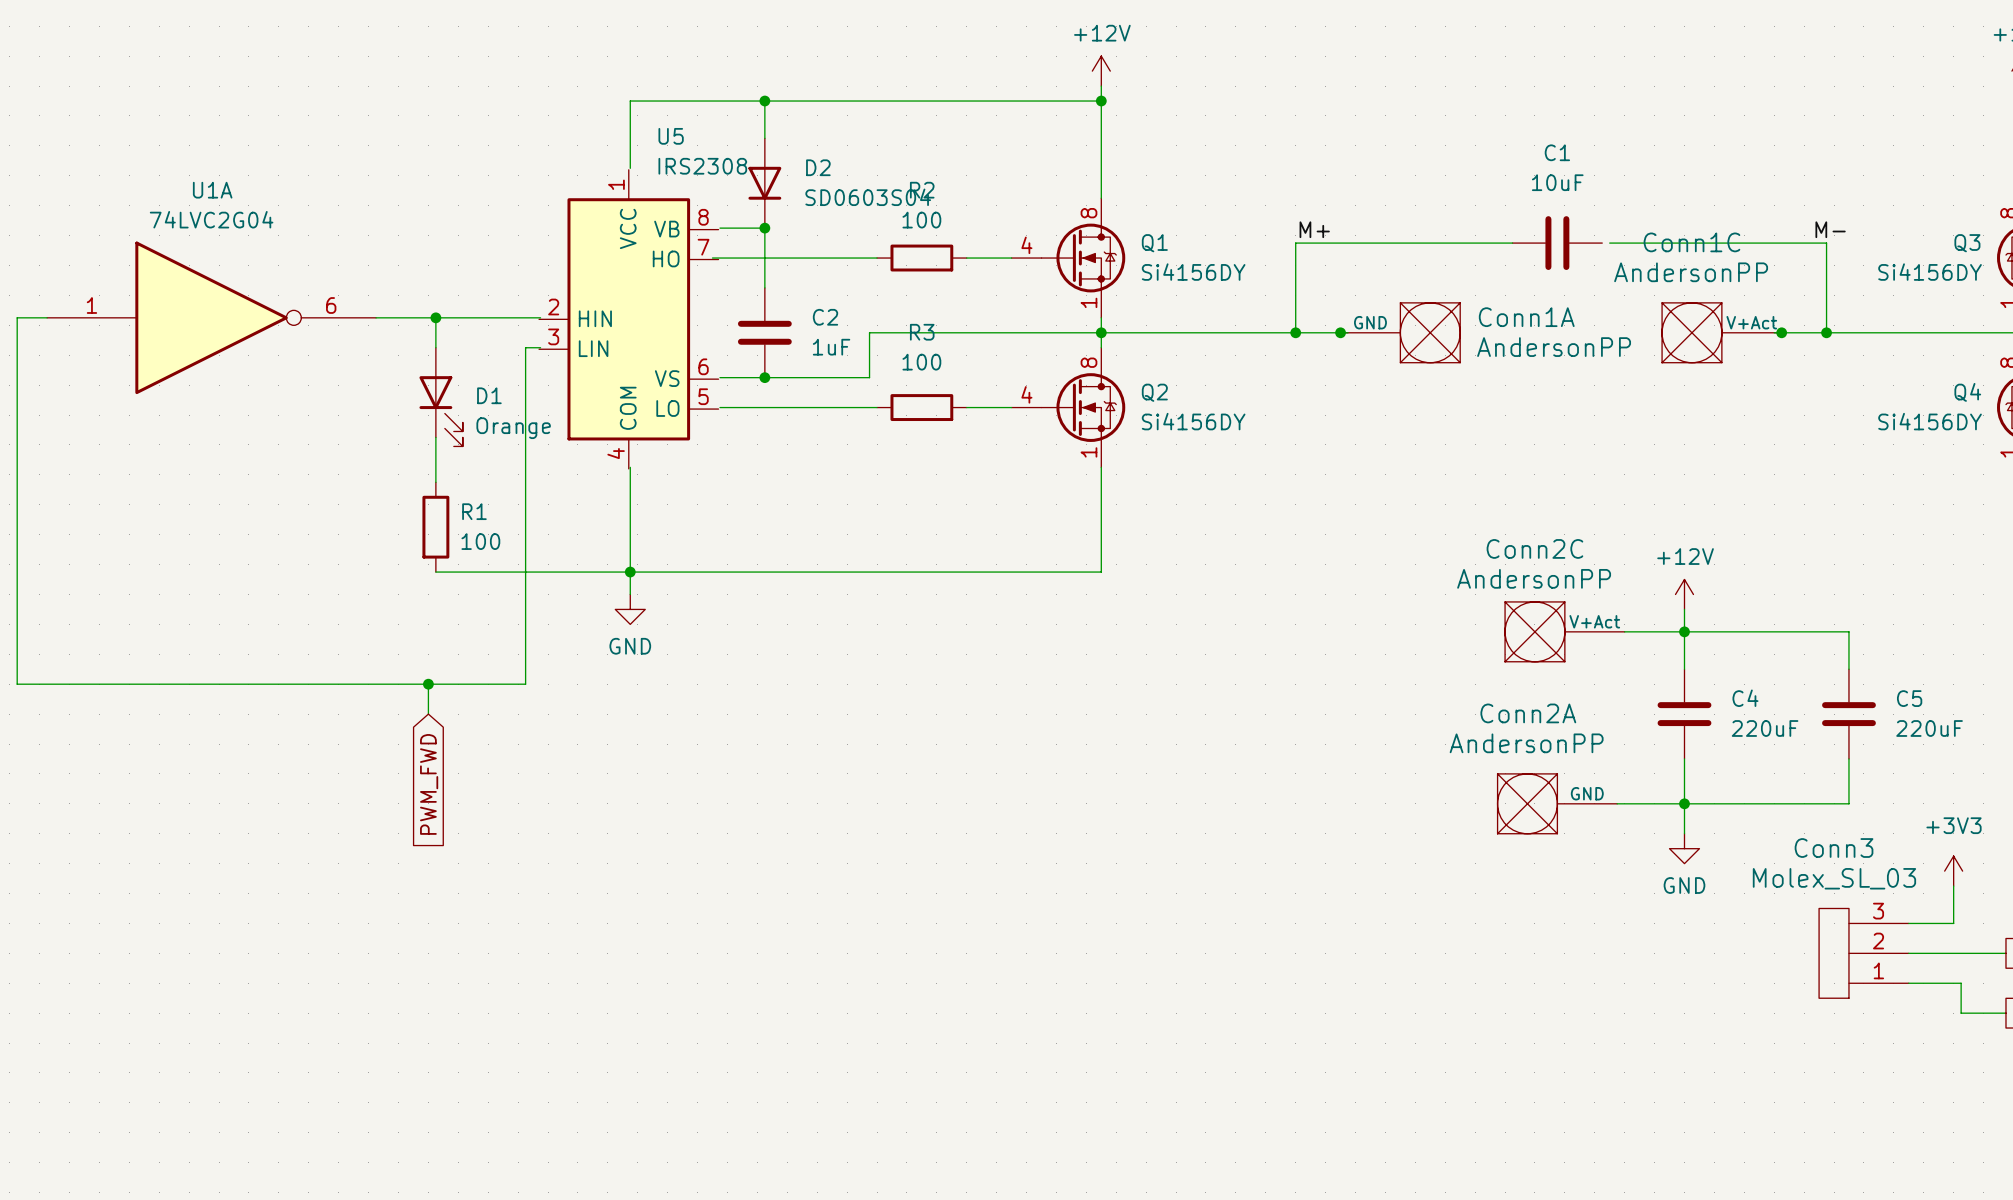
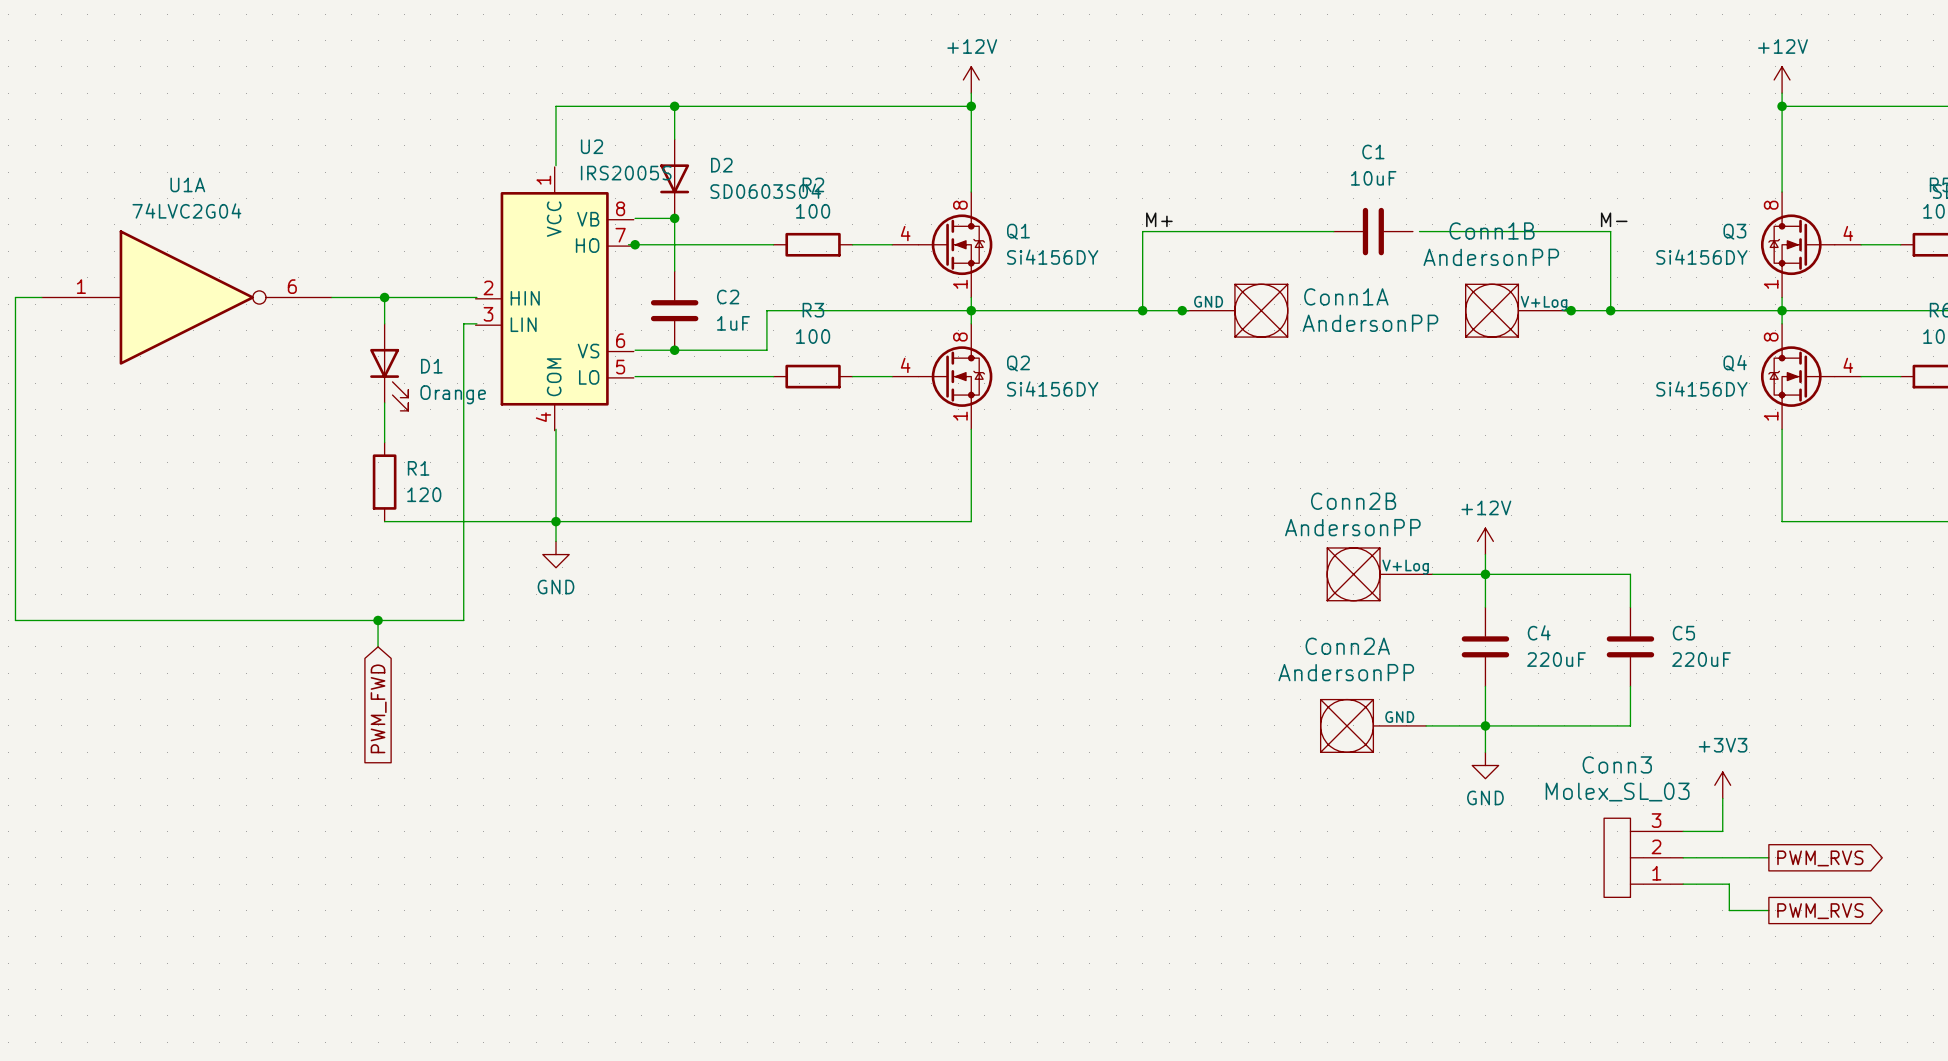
U5 name: U5 (671, 136) -> U2 (592, 146)
U5 value: IRS2308 (702, 166) -> IRS2005S (626, 173)
Conn1C name: Conn1C (1691, 242) -> Conn1B (1492, 230)
junction: none -> (635, 244)
Conn1C pin name: V+Act (1751, 322) -> V+Log (1544, 303)
R1 value: 100 (480, 541) -> 120 (424, 494)
Conn2C name: Conn2C (1534, 548) -> Conn2B (1353, 501)
Conn2C pin name: V+Act (1594, 621) -> V+Log (1405, 567)

